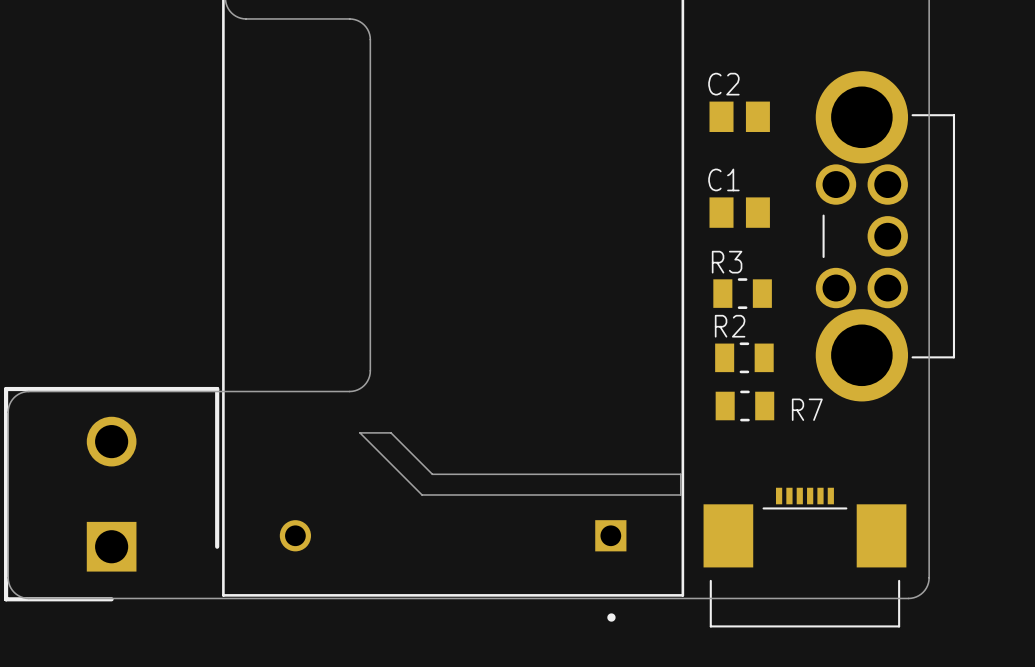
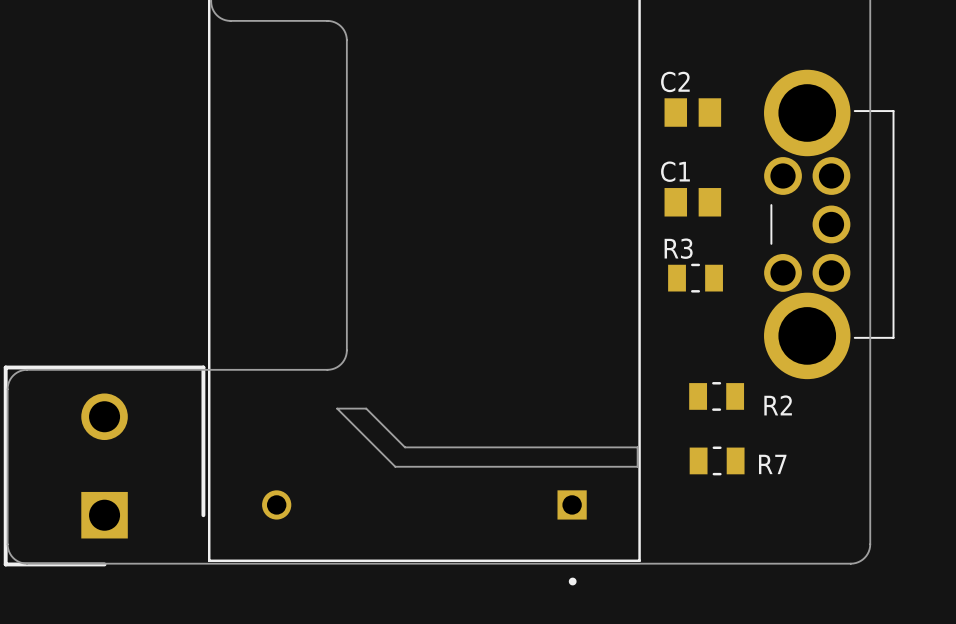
R2 name position: R2 (730, 326) -> R2 (778, 405)
R2 position: (744, 357) -> (716, 396)
R7 position: (744, 406) -> (717, 460)
part: (804, 557) -> none

